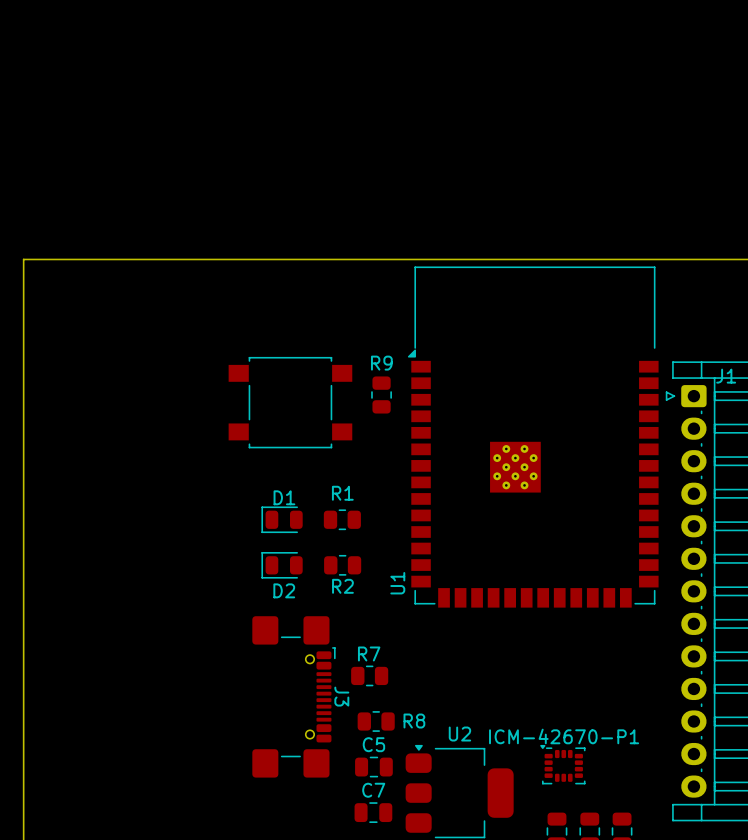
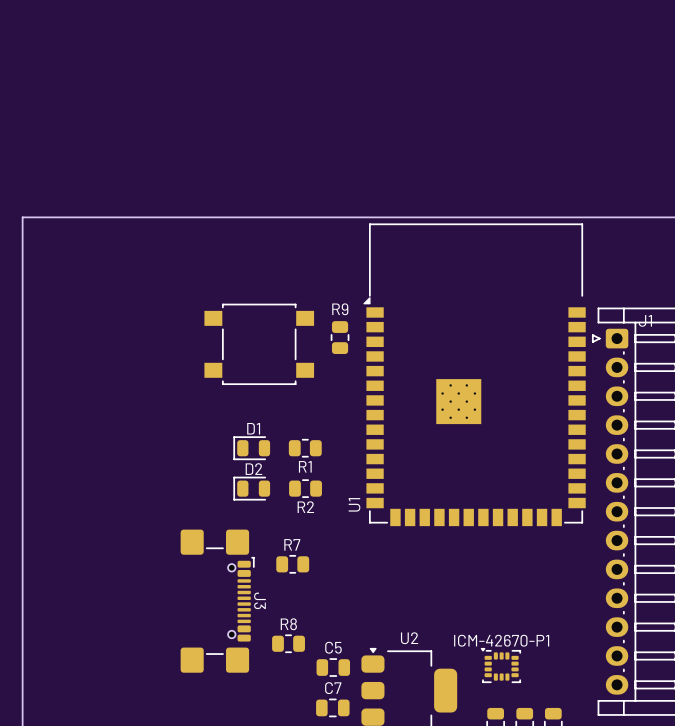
R1 name position: R1 (342, 493) -> R1 (305, 466)
D2 name position: D2 (284, 590) -> D2 (253, 469)
R7 position: (369, 675) -> (292, 564)
J3 position: (293, 696) -> (217, 601)
R8 position: (376, 721) -> (288, 643)
R8 name position: R8 (414, 721) -> R8 (288, 624)

